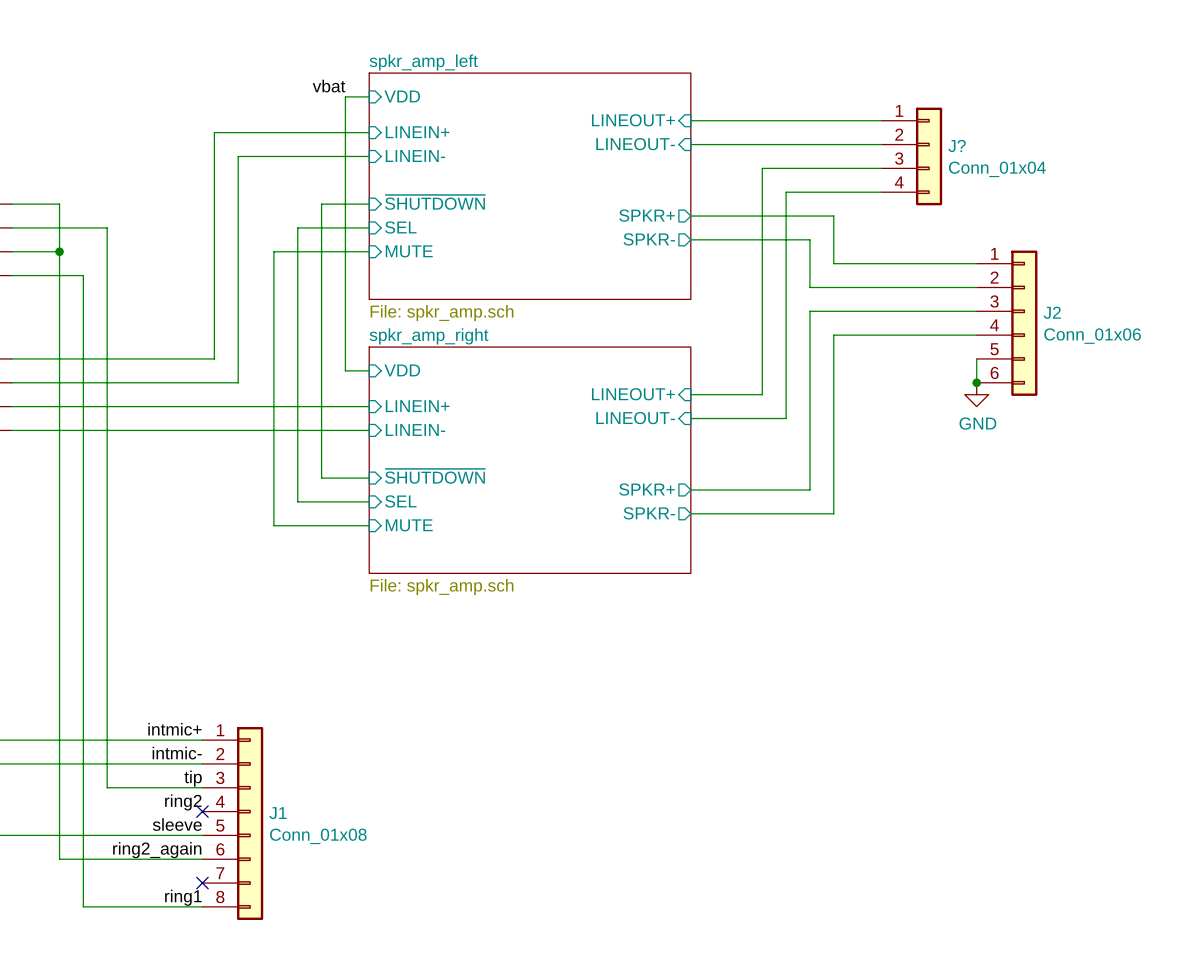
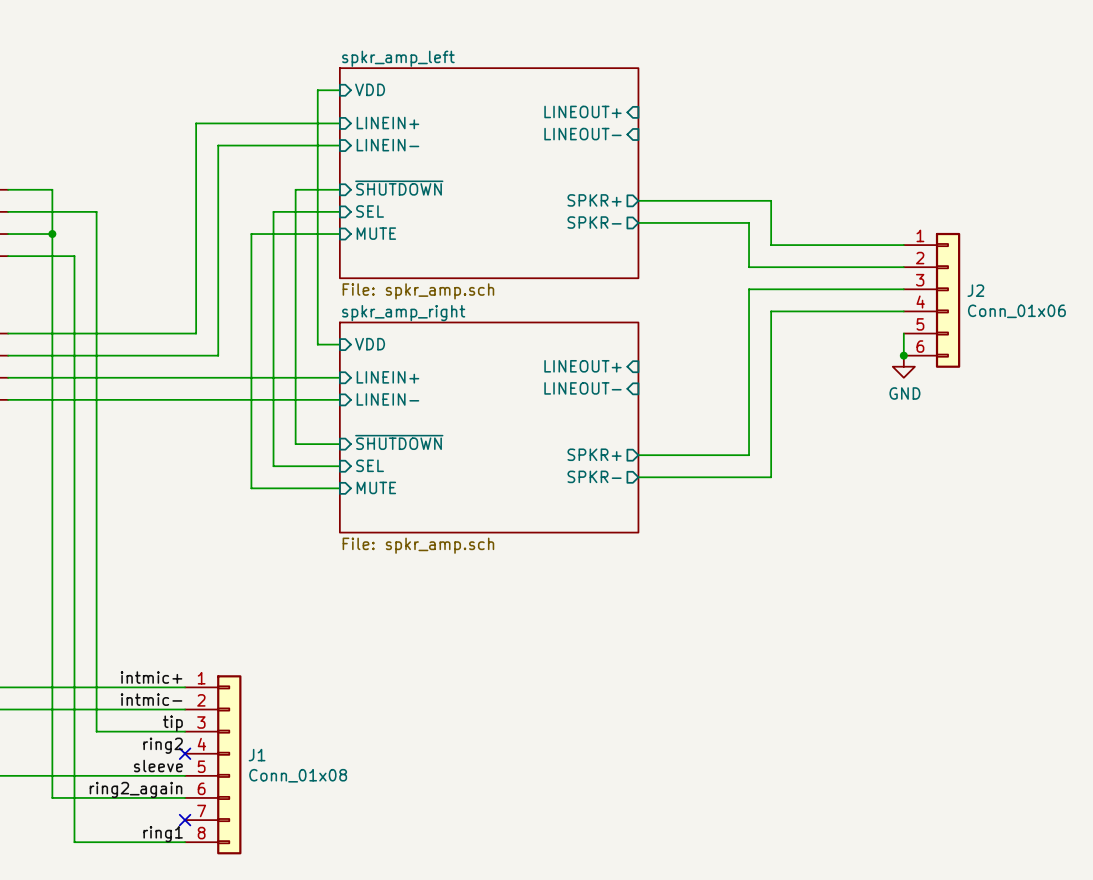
label: vbat (329, 86) -> none
wire: (690, 120) (881, 120) -> none
wire: (690, 144) (881, 144) -> none
J?: Conn_01x04 (911, 156) -> none
wire: (881, 168) (762, 168) (762, 394) (690, 394) -> none
wire: (881, 192) (786, 192) (786, 418) (690, 418) -> none

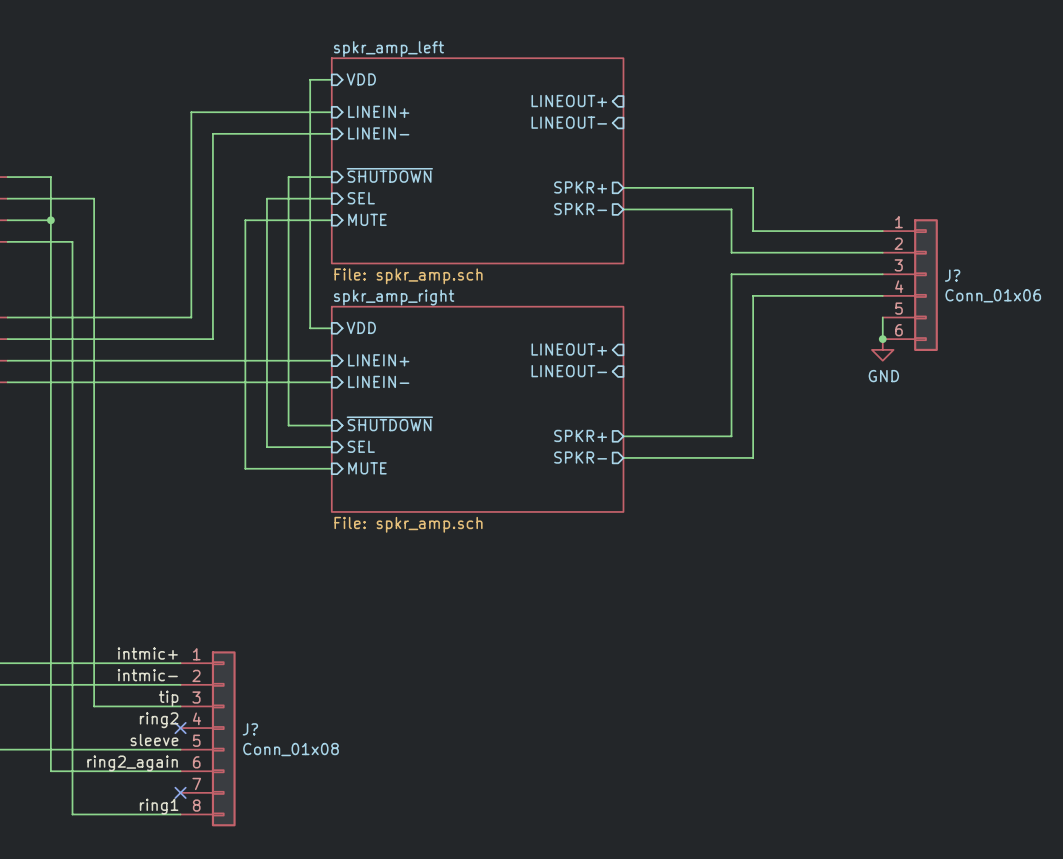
J2 name: J2 (975, 290) -> J? (952, 275)
J1 name: J1 (257, 755) -> J? (250, 729)

